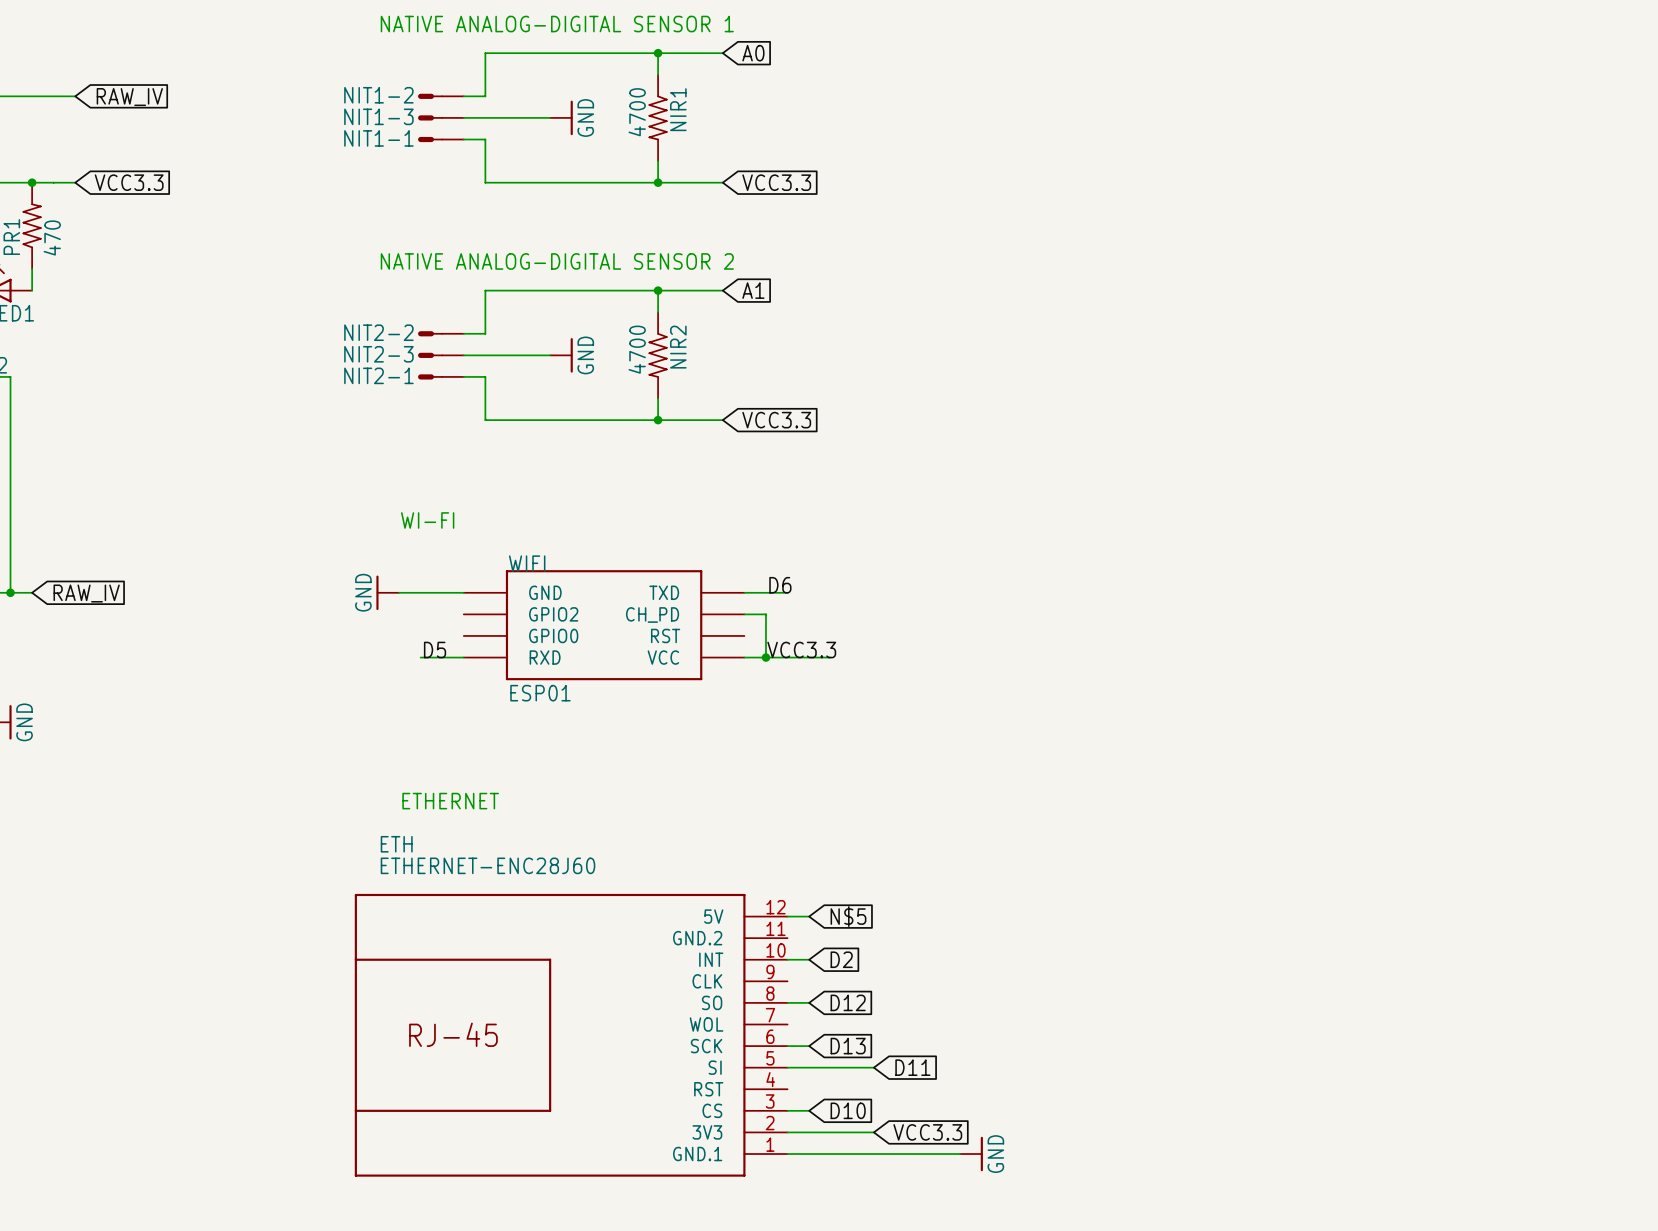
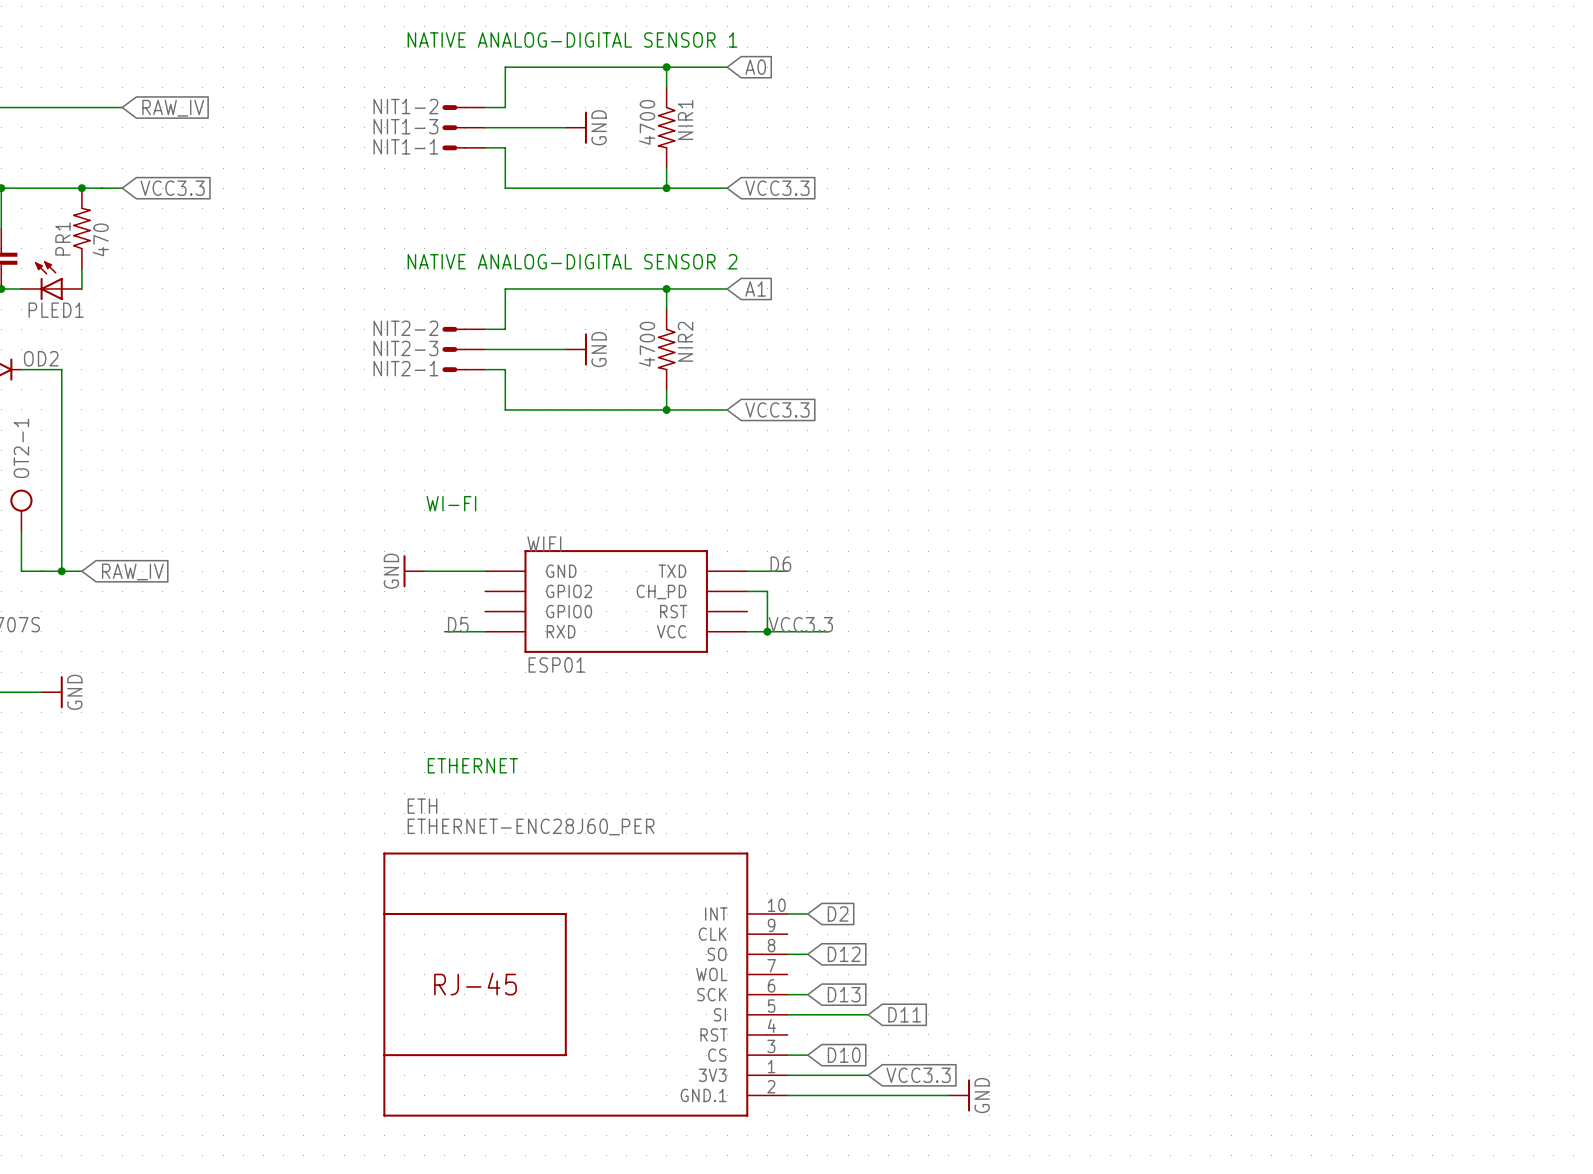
ETH value: ETHERNET-ENC28J60 (488, 865) -> ETHERNET-ENC28J60_PER (531, 826)
ETH symbol: [354, 893, 788, 1177] -> [383, 852, 788, 1117]
wire: (787, 916) (809, 916) -> none
global label: N$5 (848, 916) -> none

